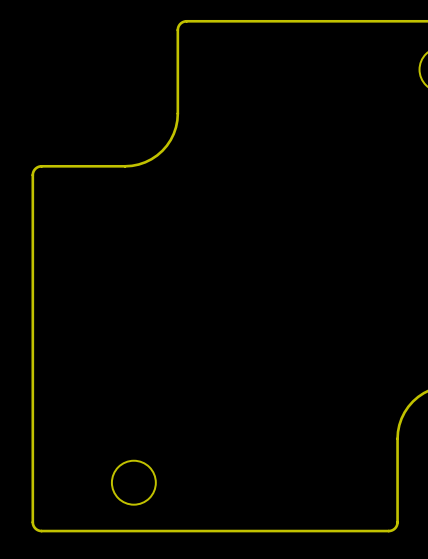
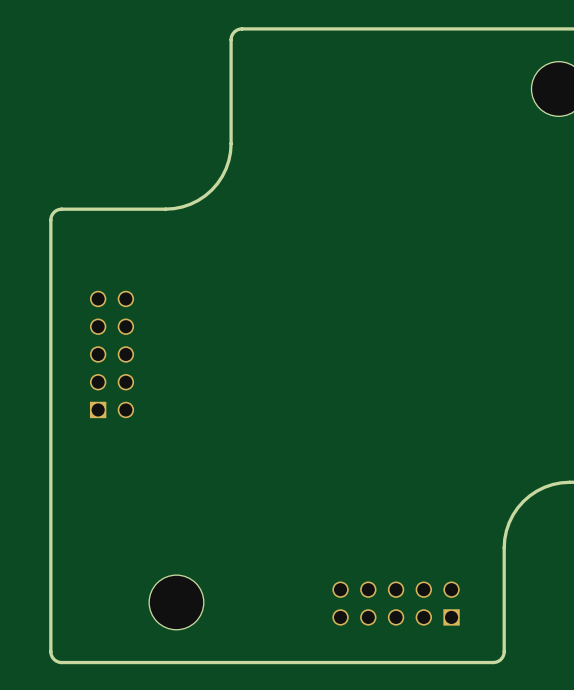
part: none -> (112, 354)
part: none -> (396, 603)

